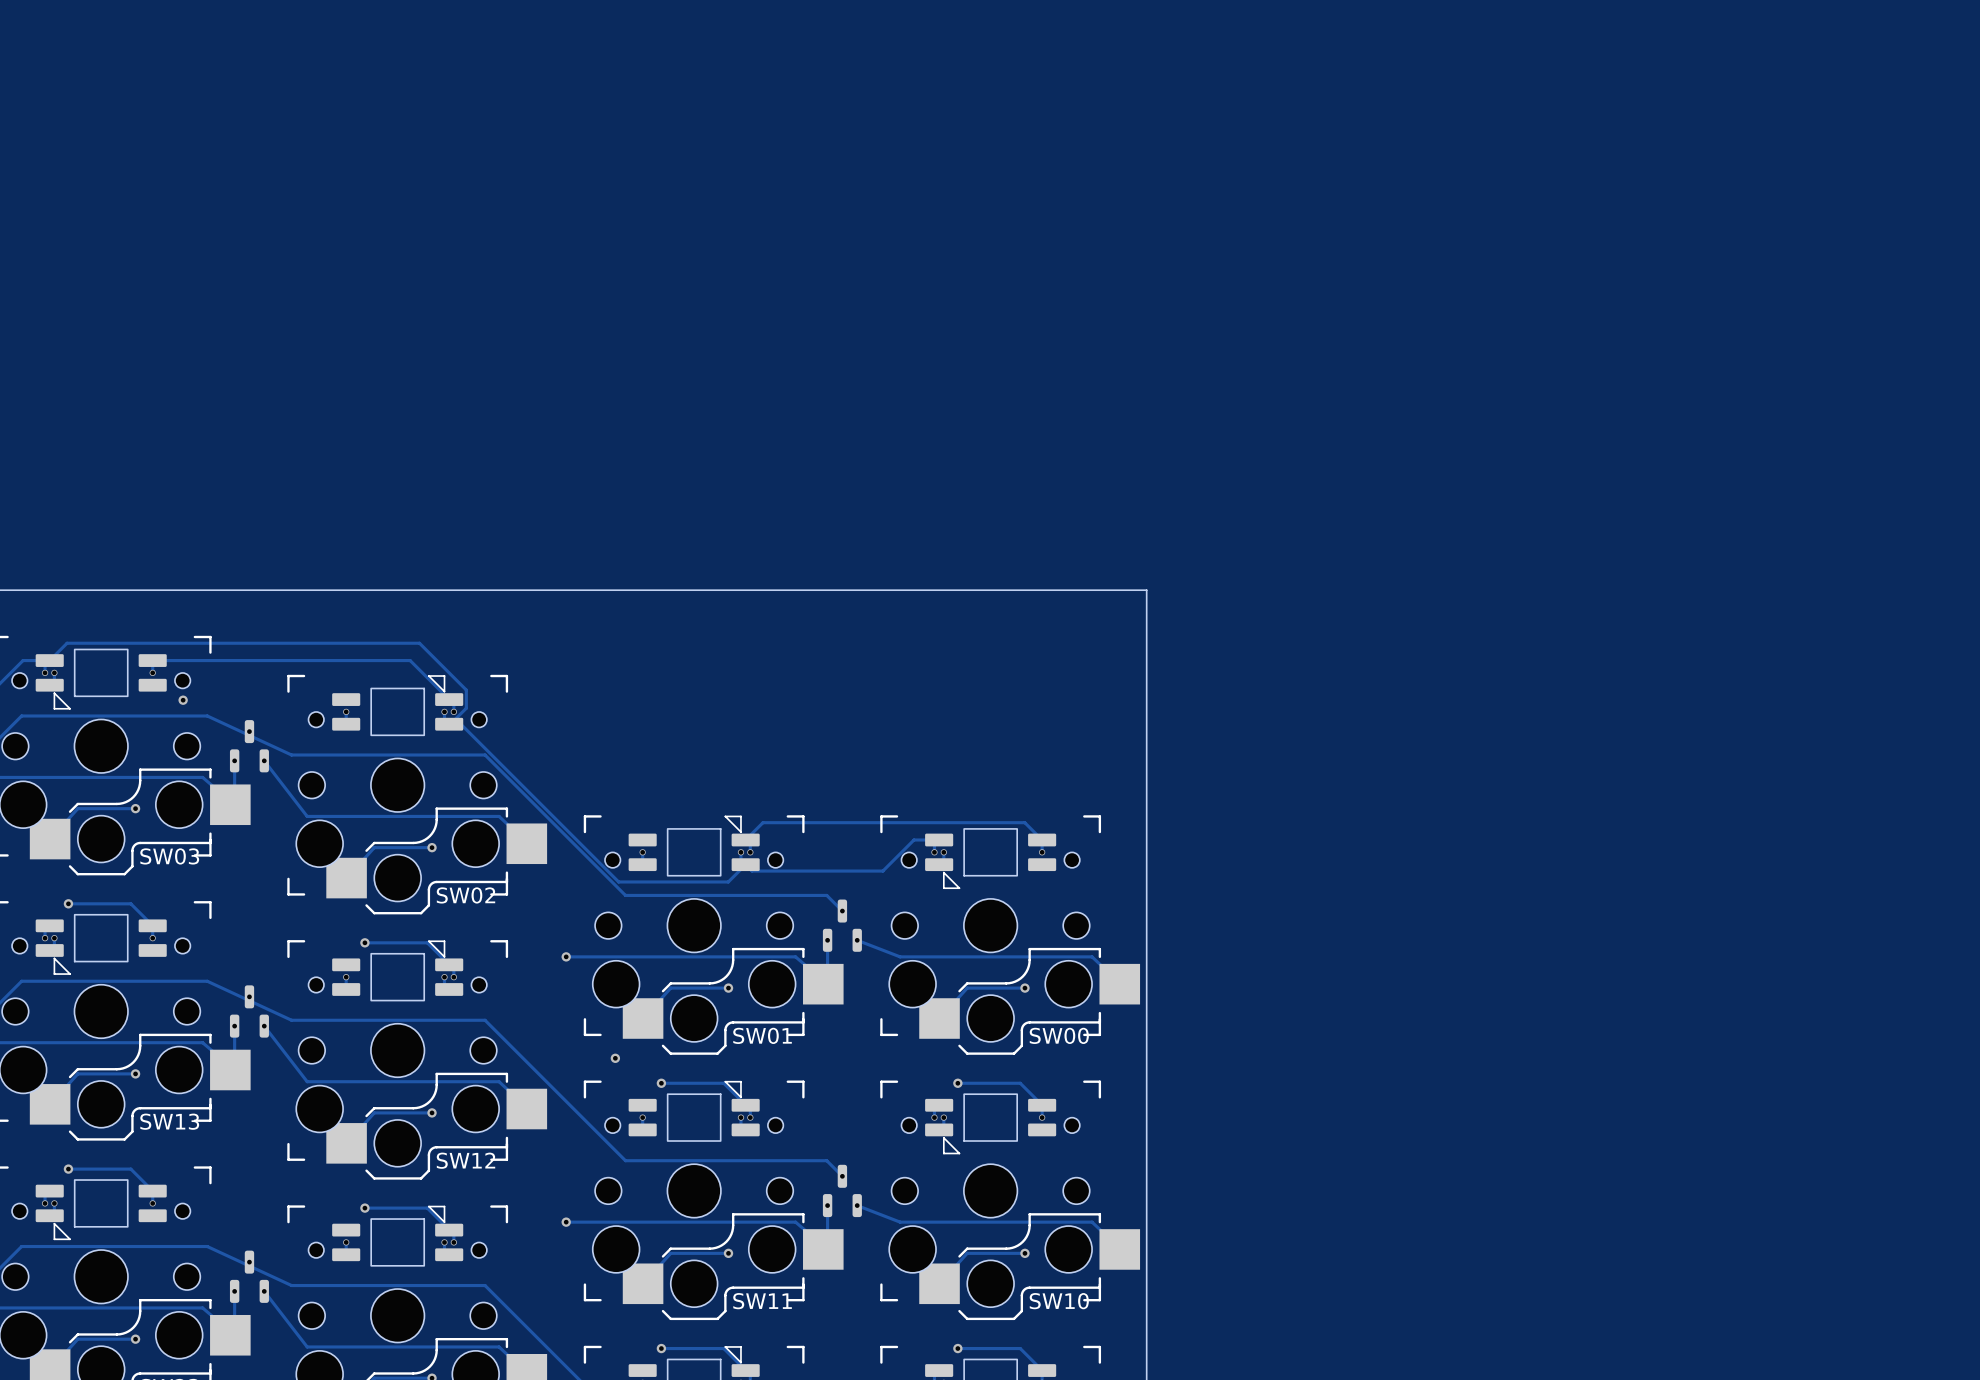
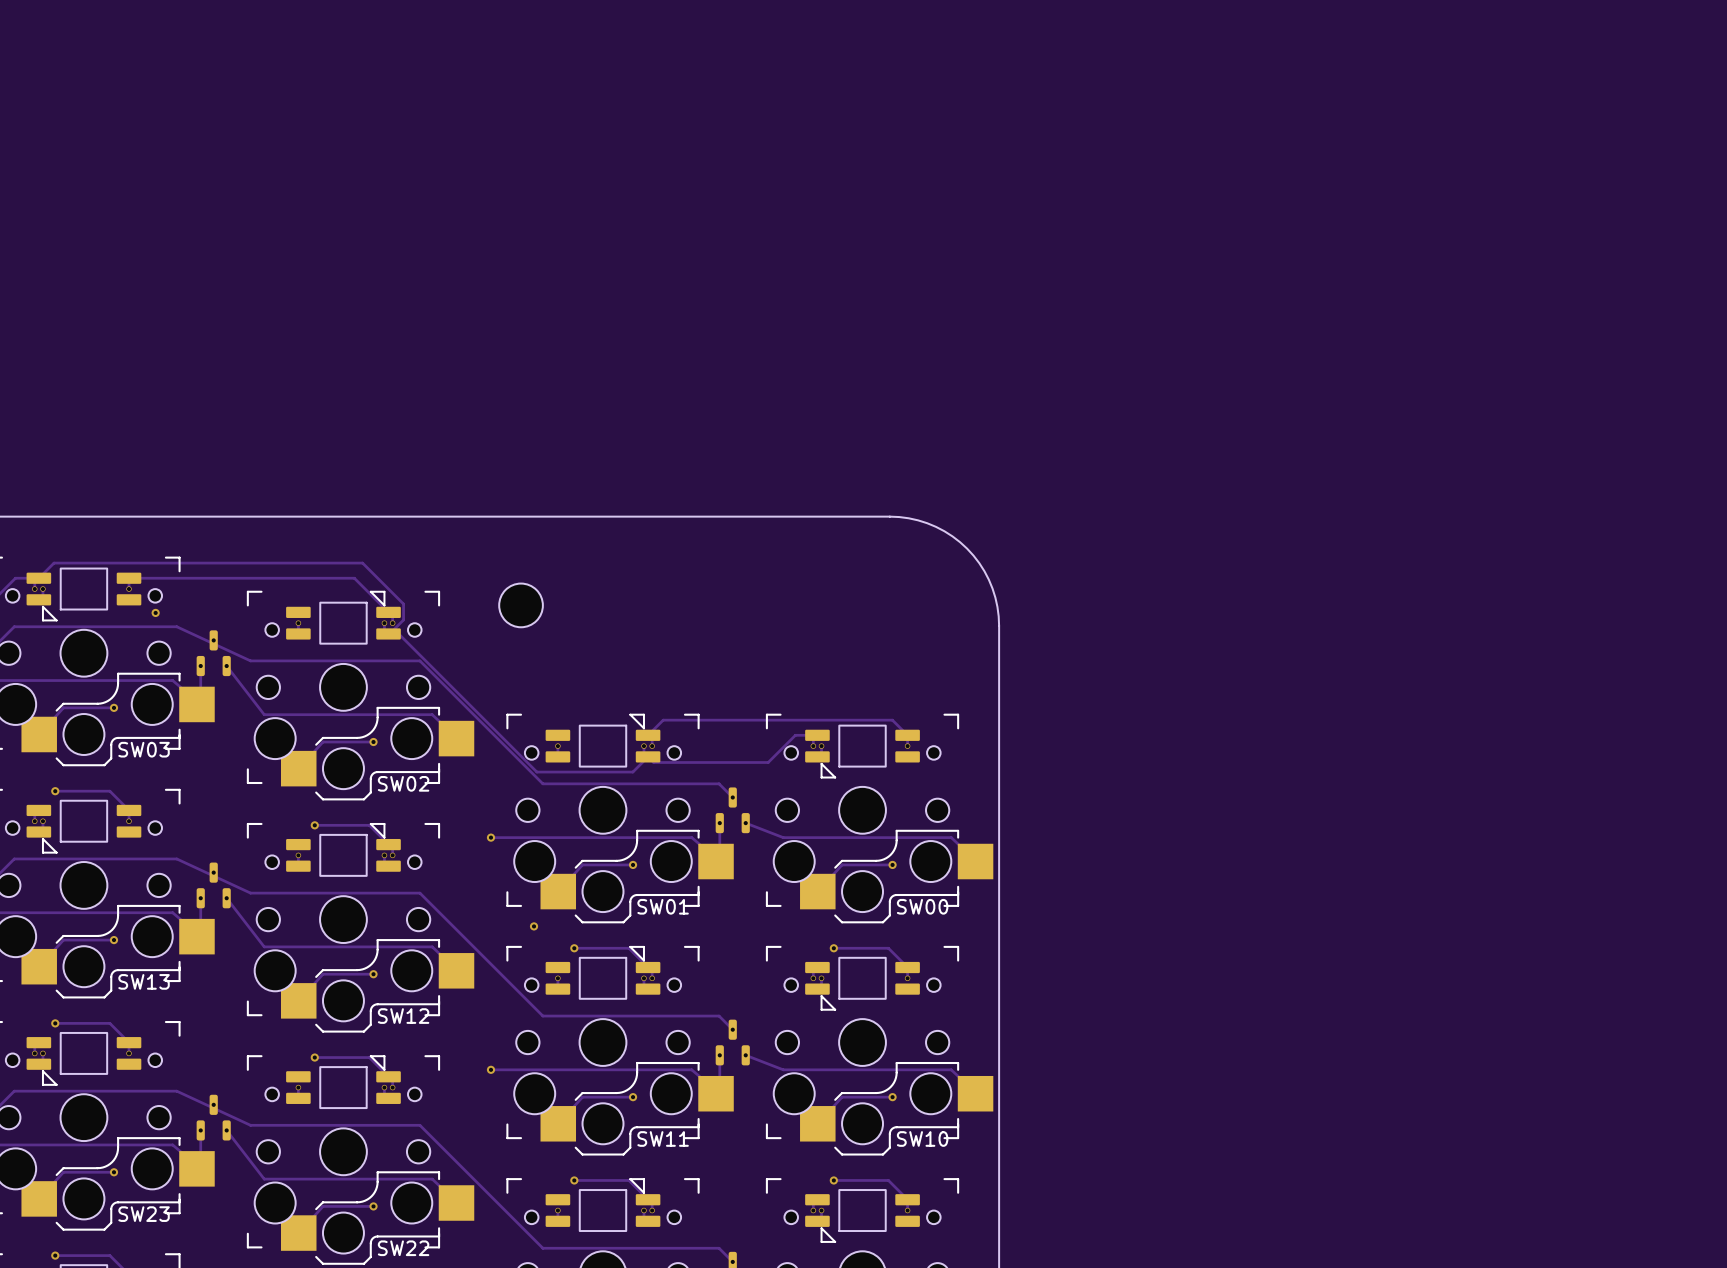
board edge: (1021, 590) (1146, 590) (1146, 715) -> (889, 516) (908, 518) (927, 523) (952, 536) (967, 548) (979, 563) (992, 588) (997, 606) (999, 625)
part: none -> (521, 605)

